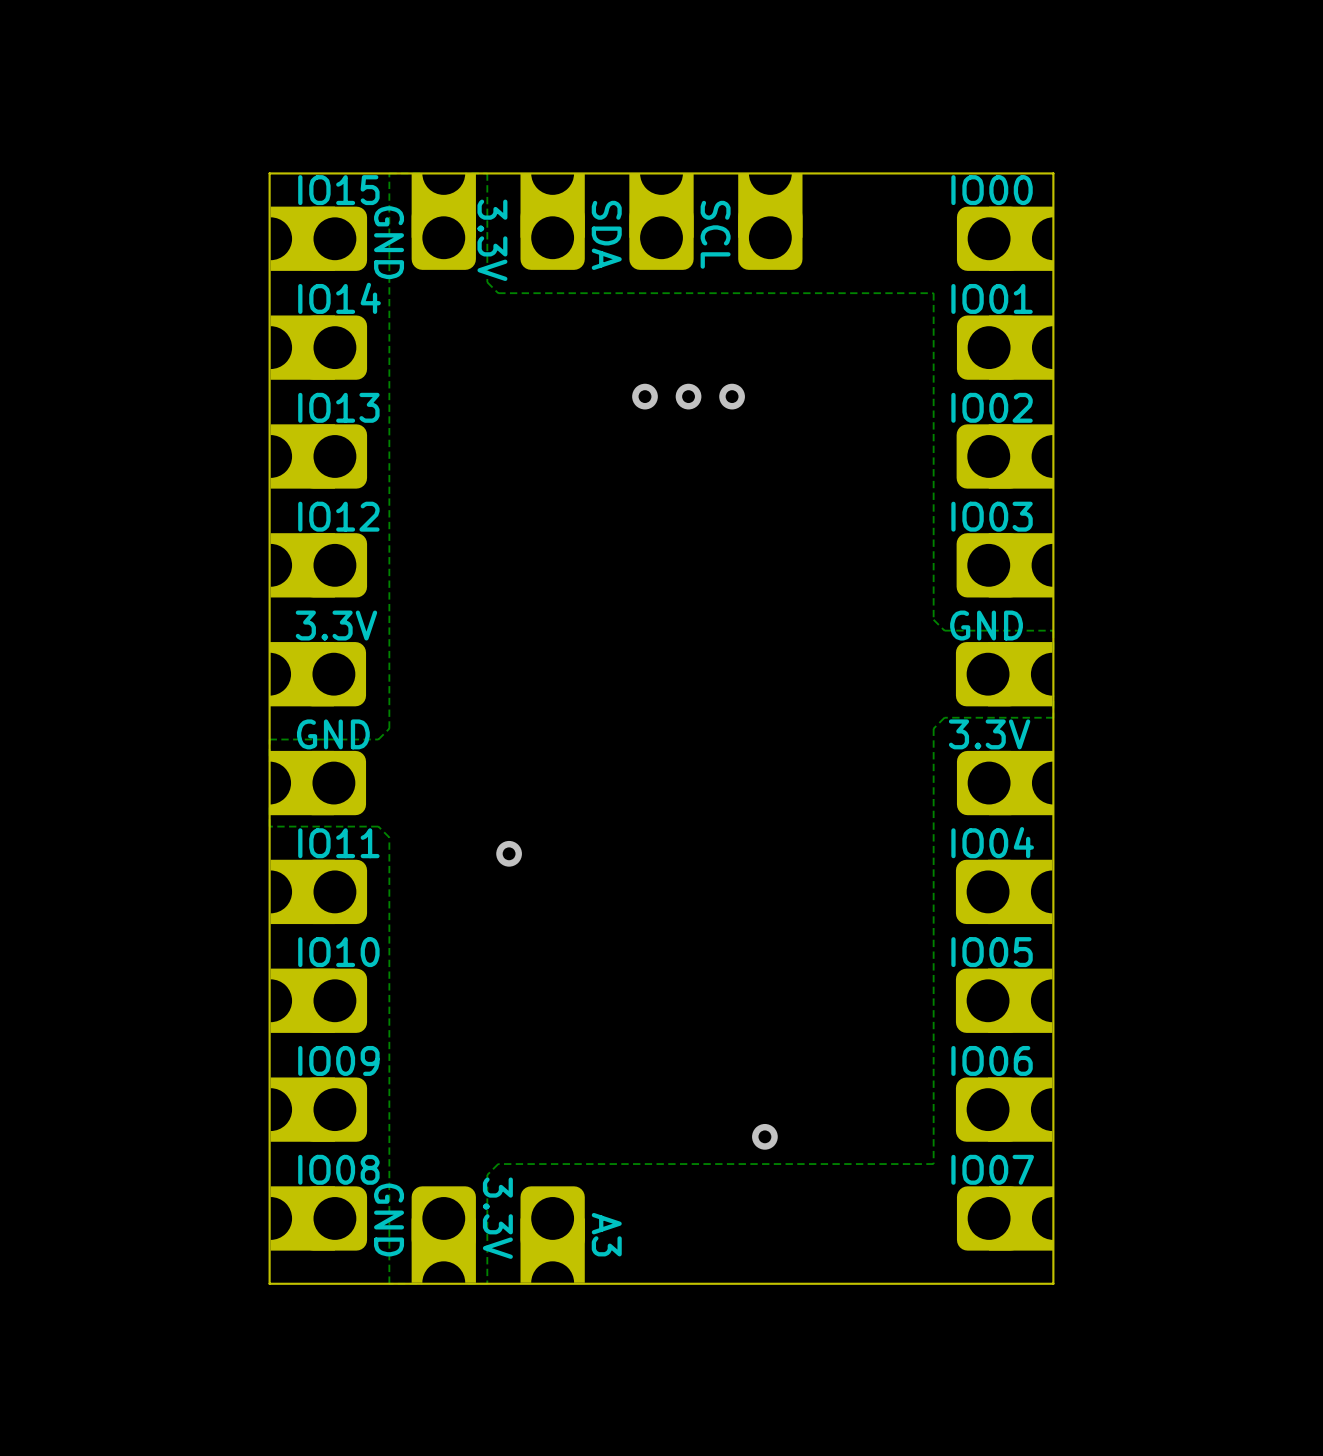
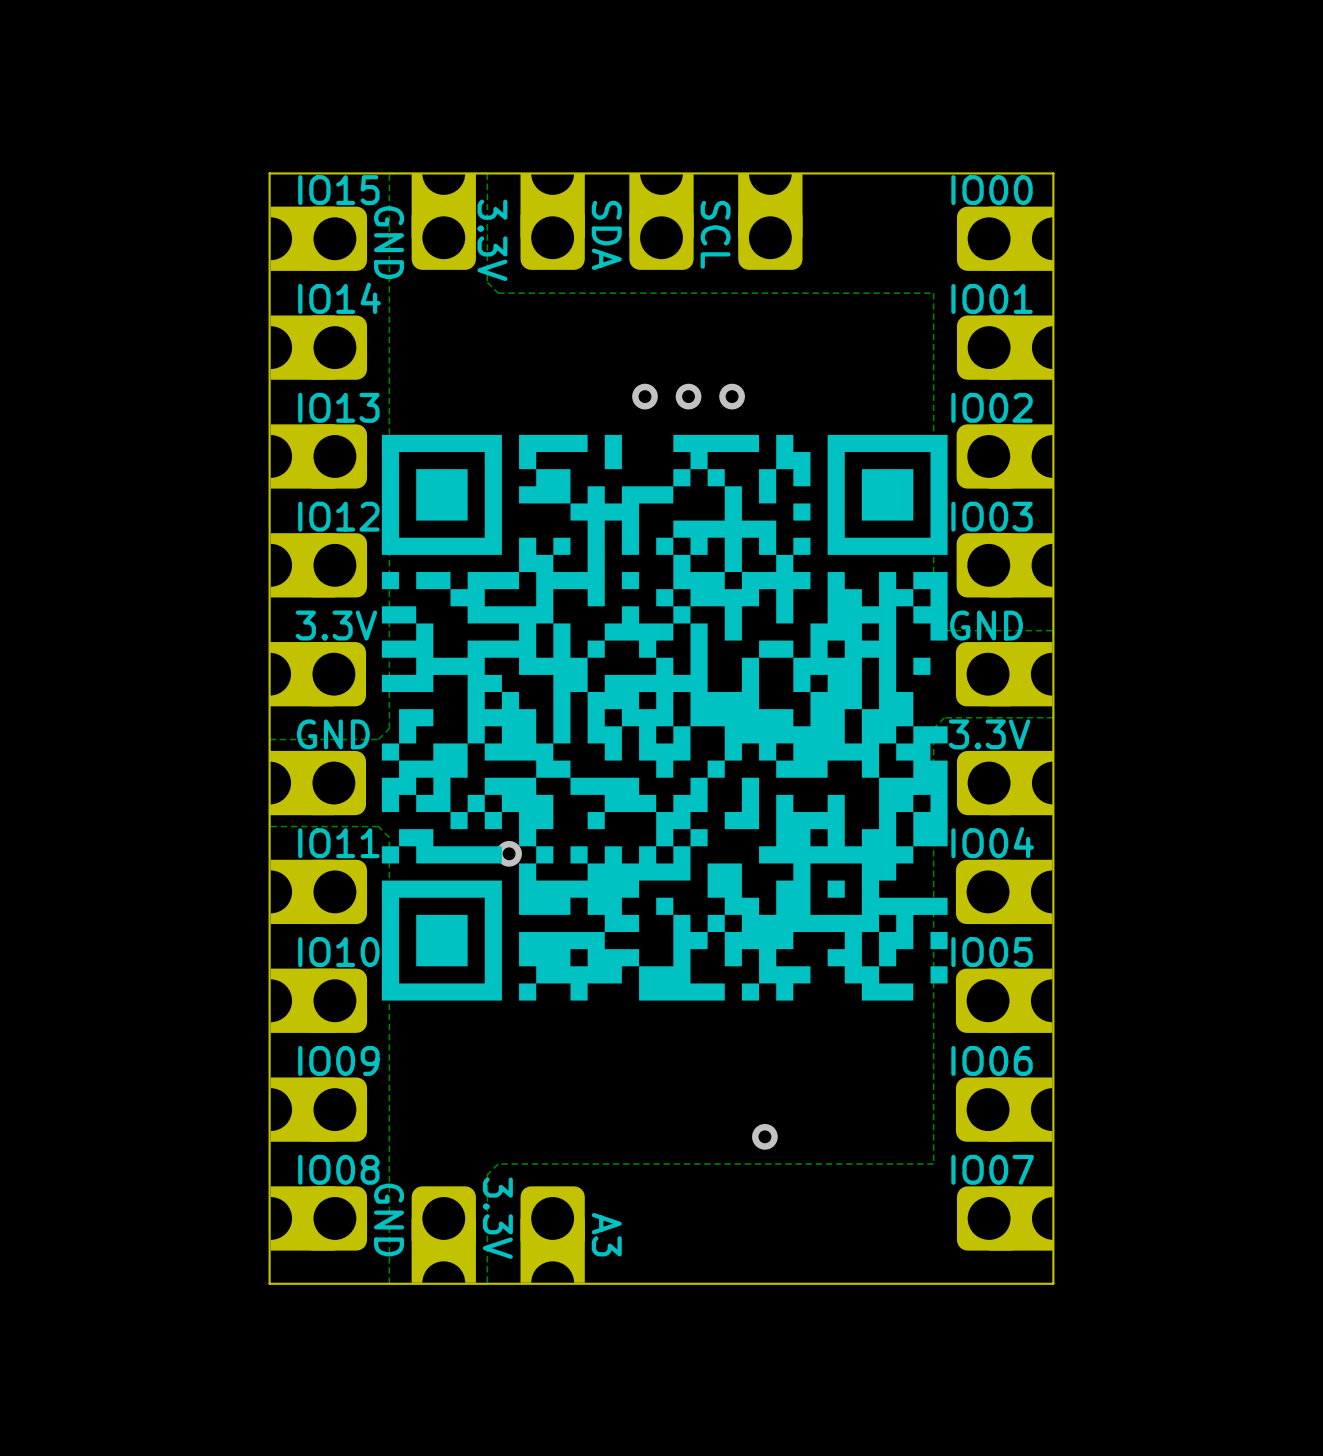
drawing: none -> [381, 434, 948, 1001]

